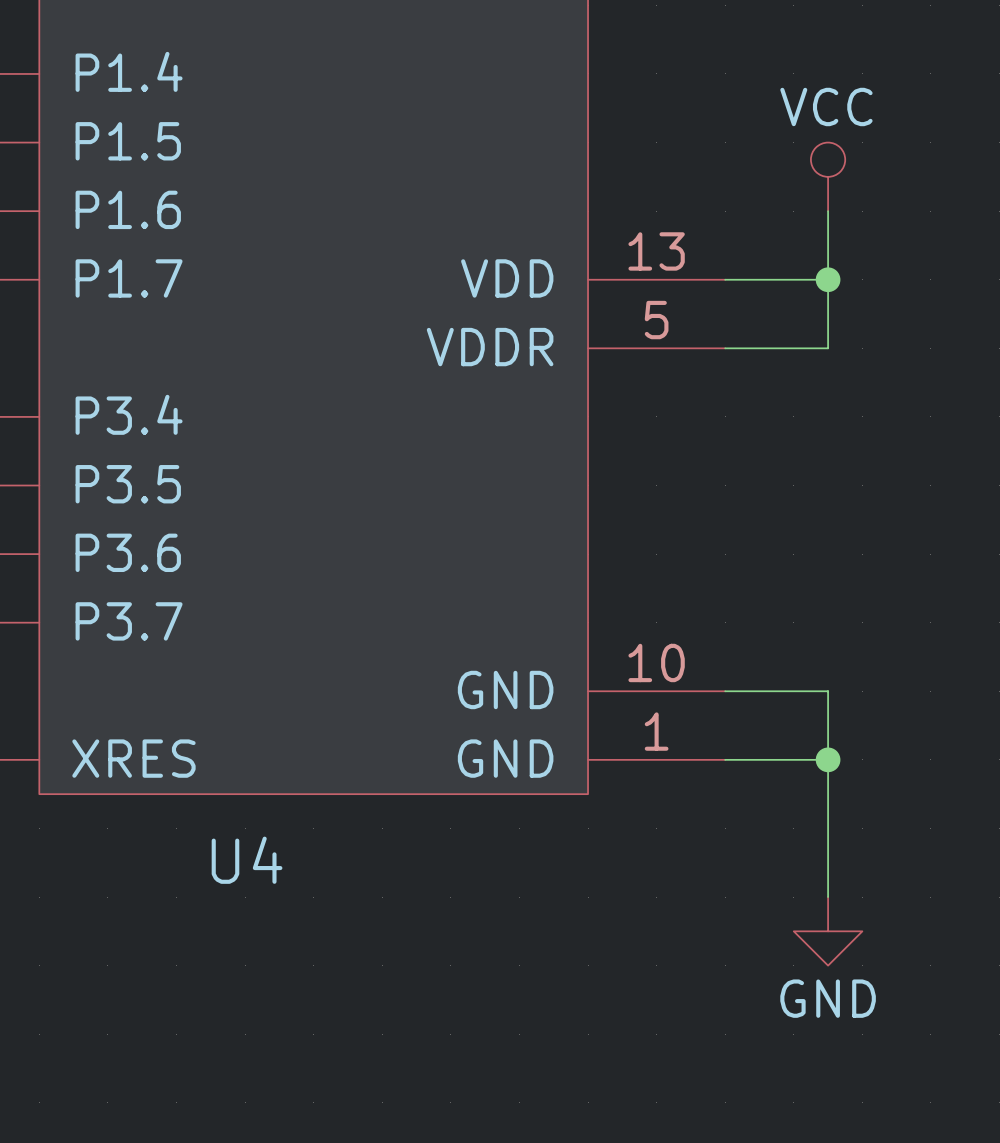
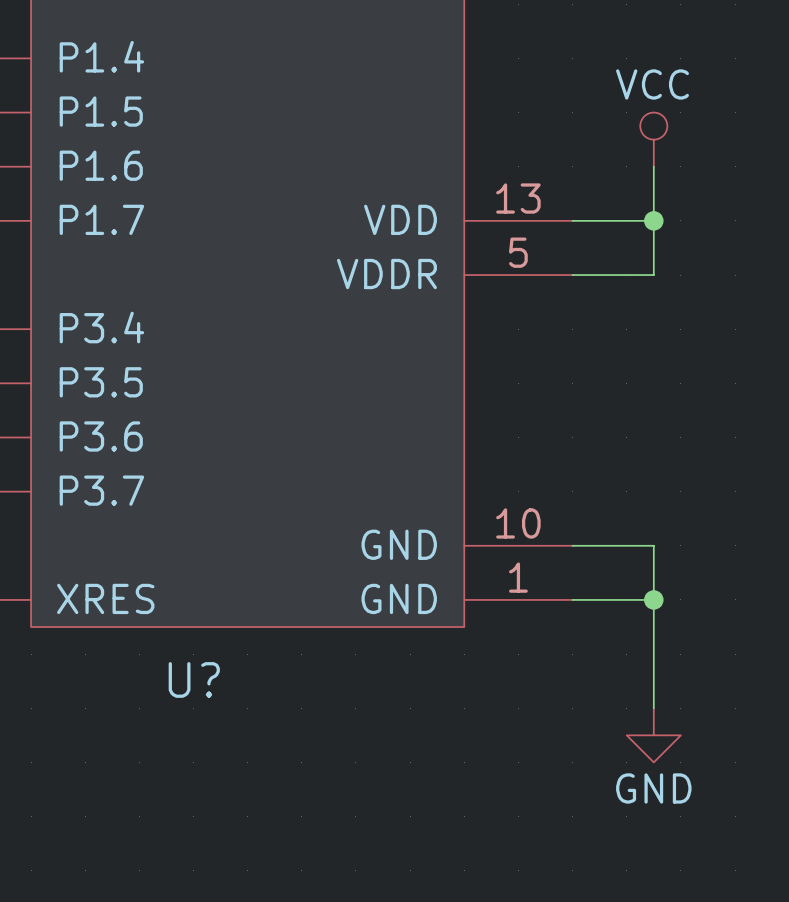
U4 name: U4 (247, 860) -> U? (194, 679)

